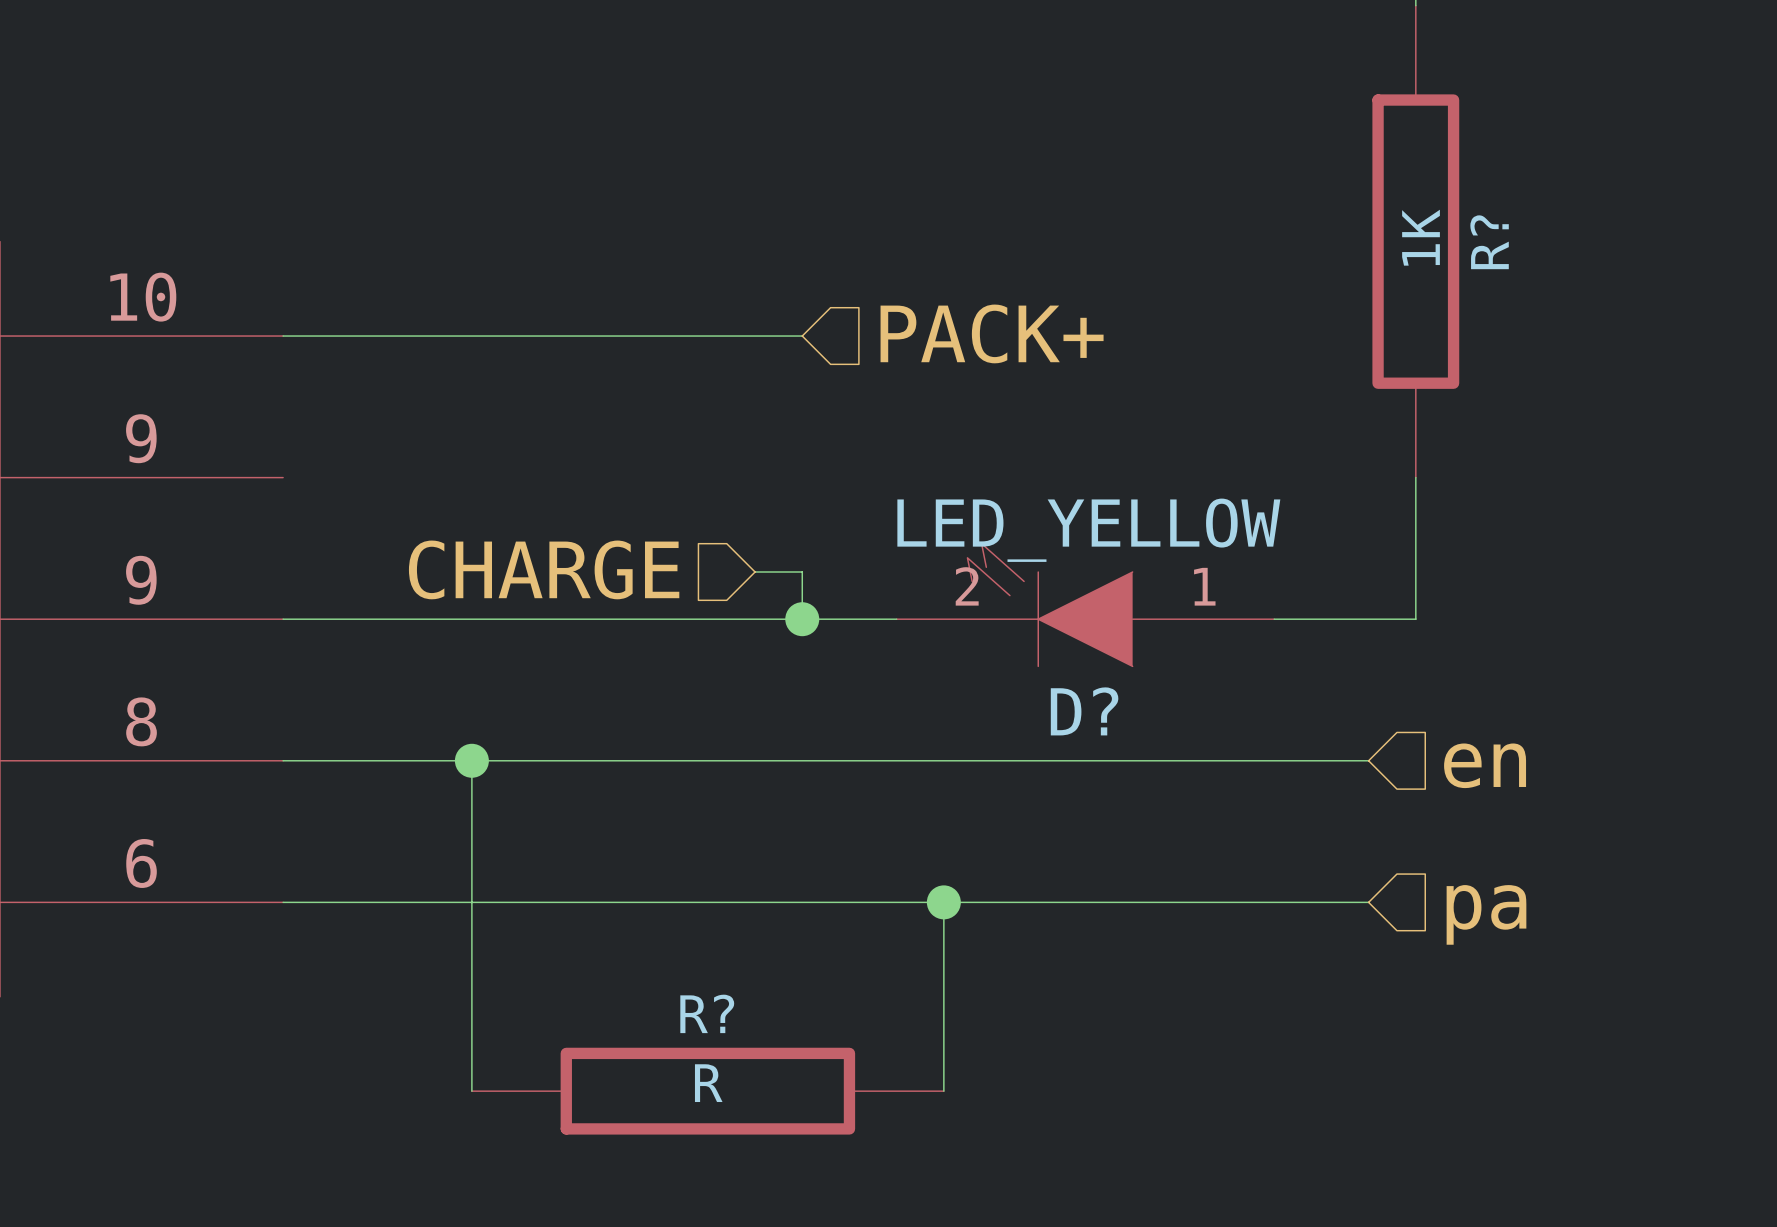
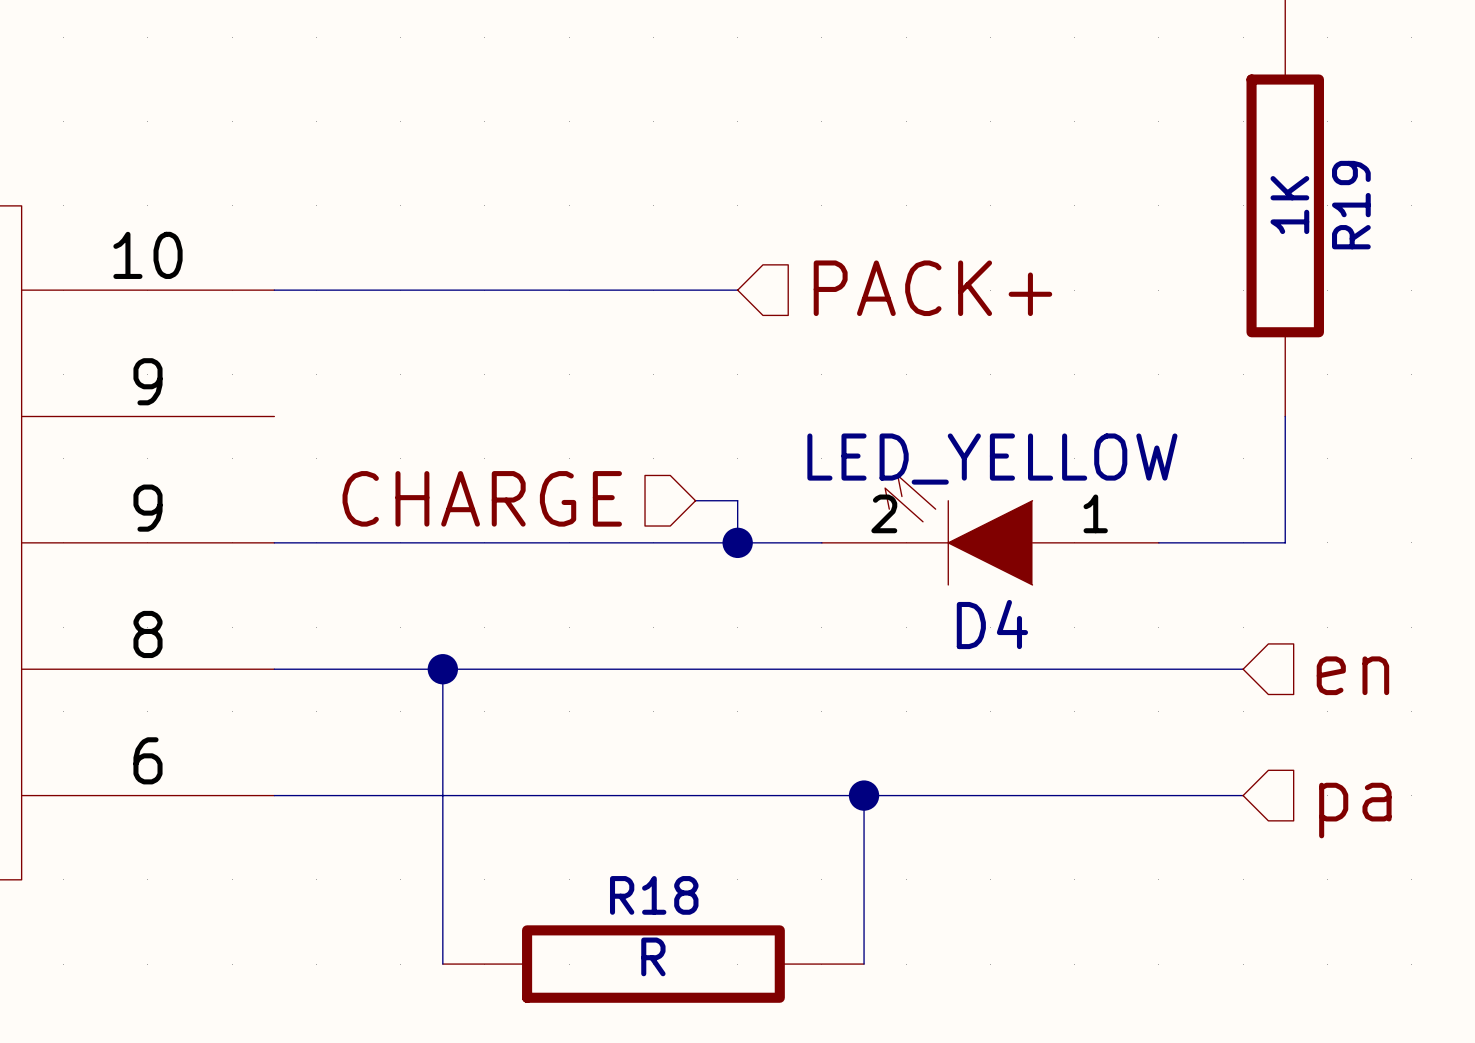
R? name: R? (1489, 242) -> R19 (1351, 205)
D? name: D? (1084, 711) -> D4 (992, 624)
R? name: R? (707, 1013) -> R18 (654, 895)

